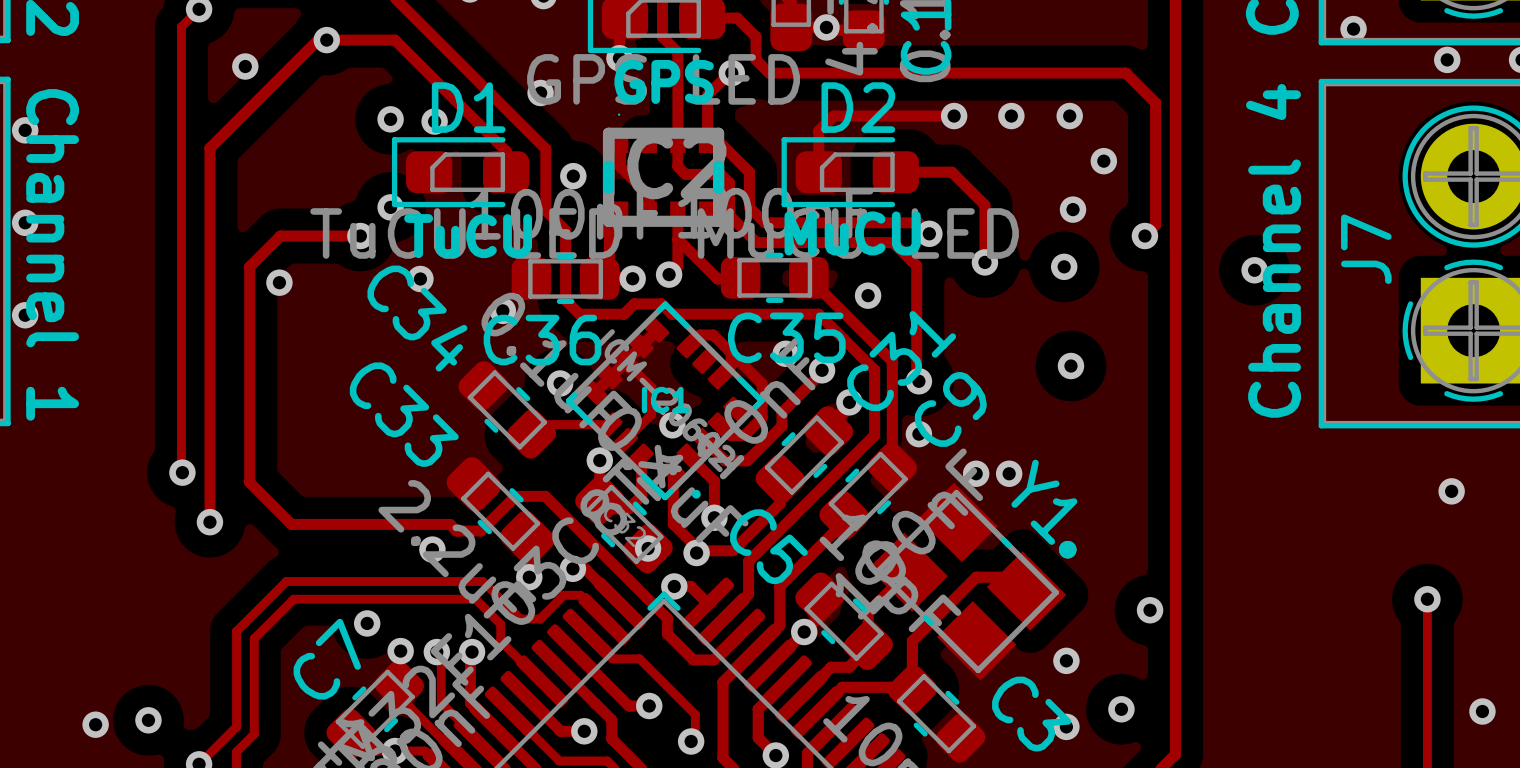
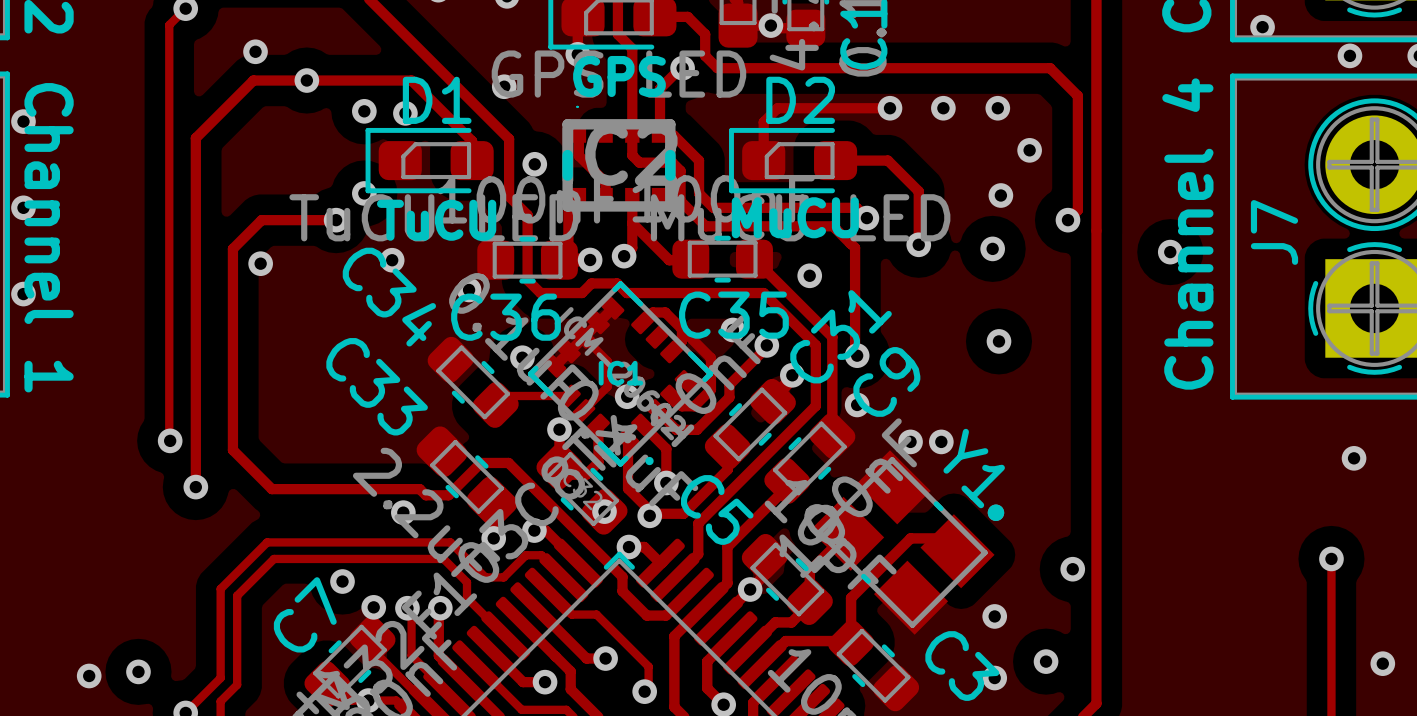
via: (326, 40) -> none
via: none -> (255, 51)
via: (245, 66) -> none
track: (271, 86) (317, 40) (395, 40) (441, 86) -> (253, 80) (411, 80)
via: none -> (306, 80)

